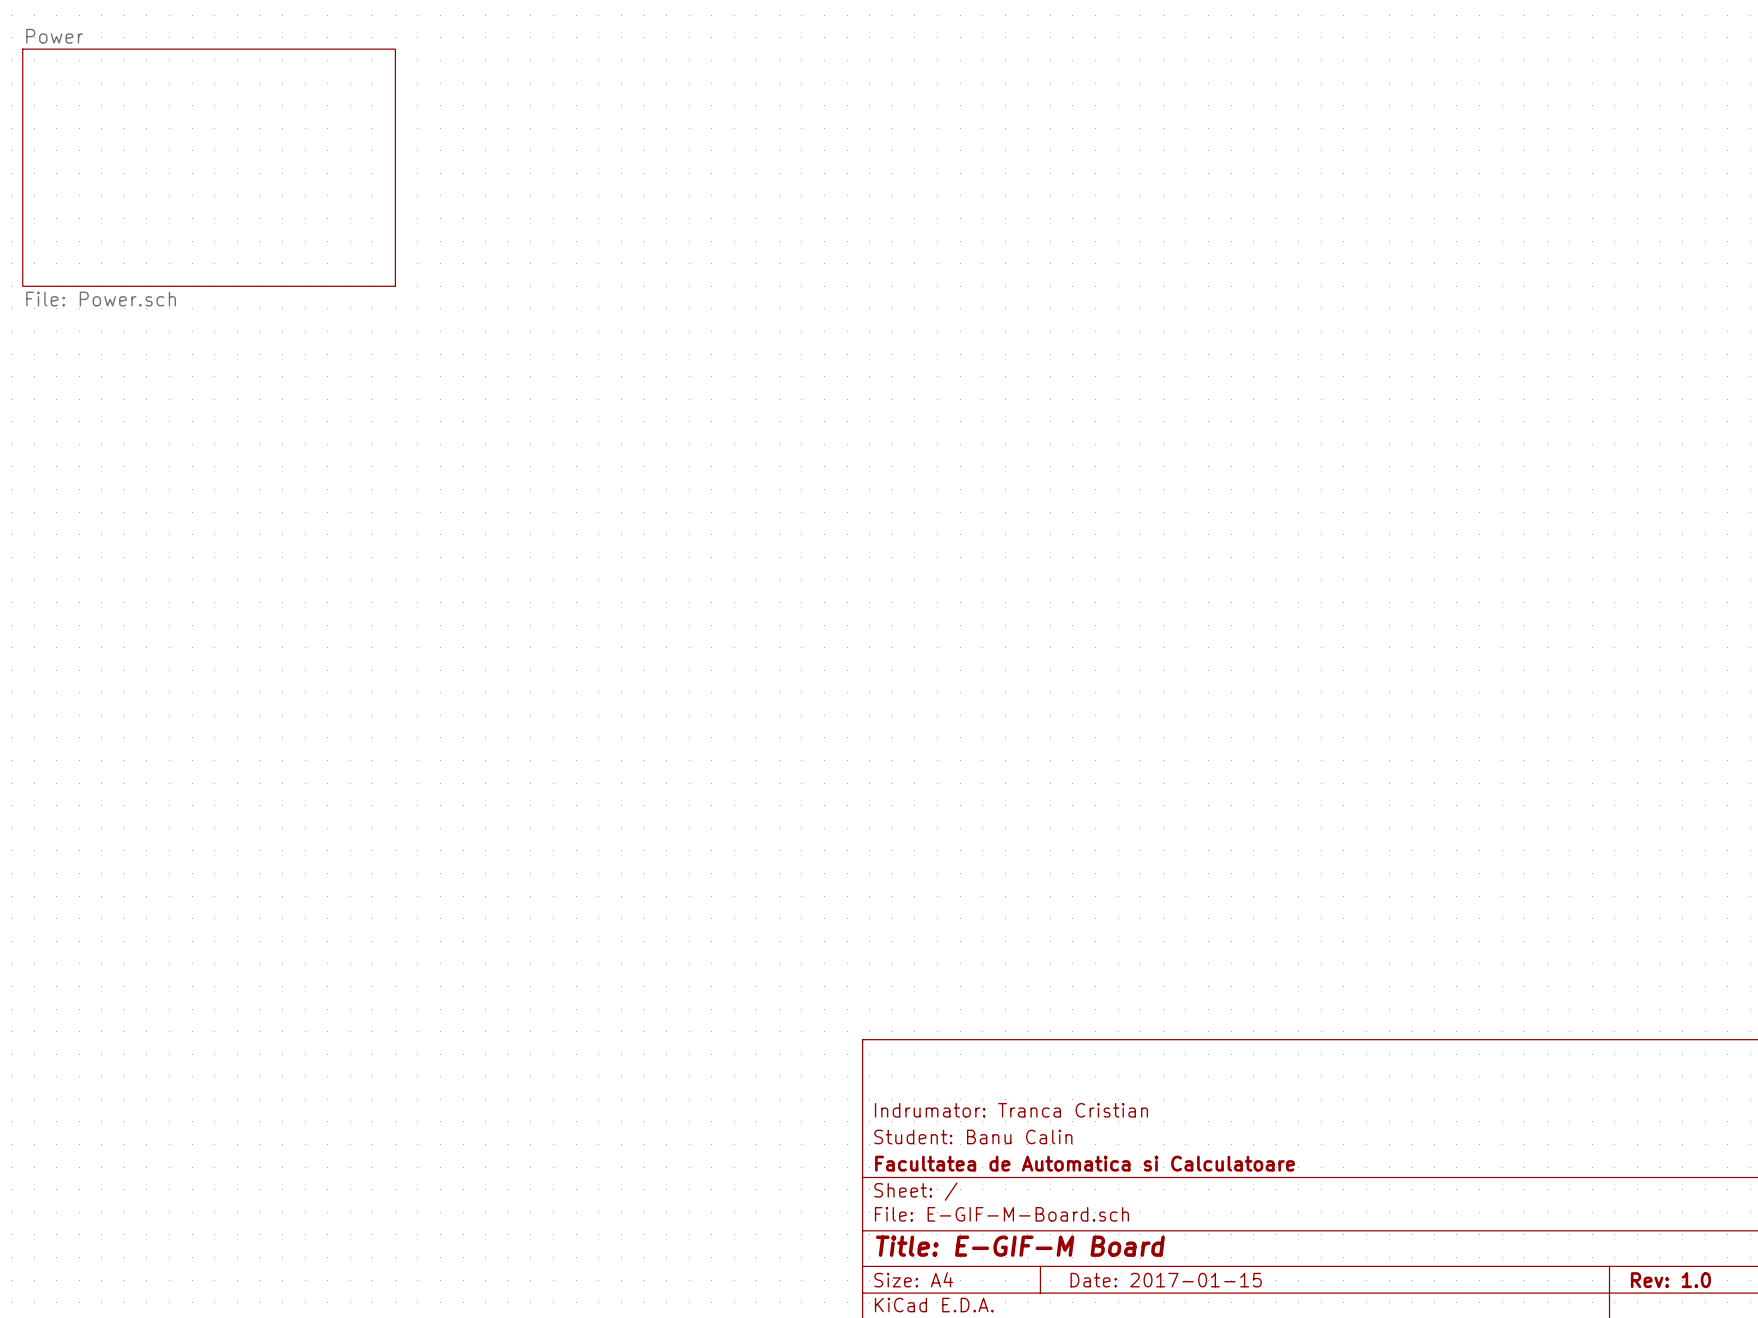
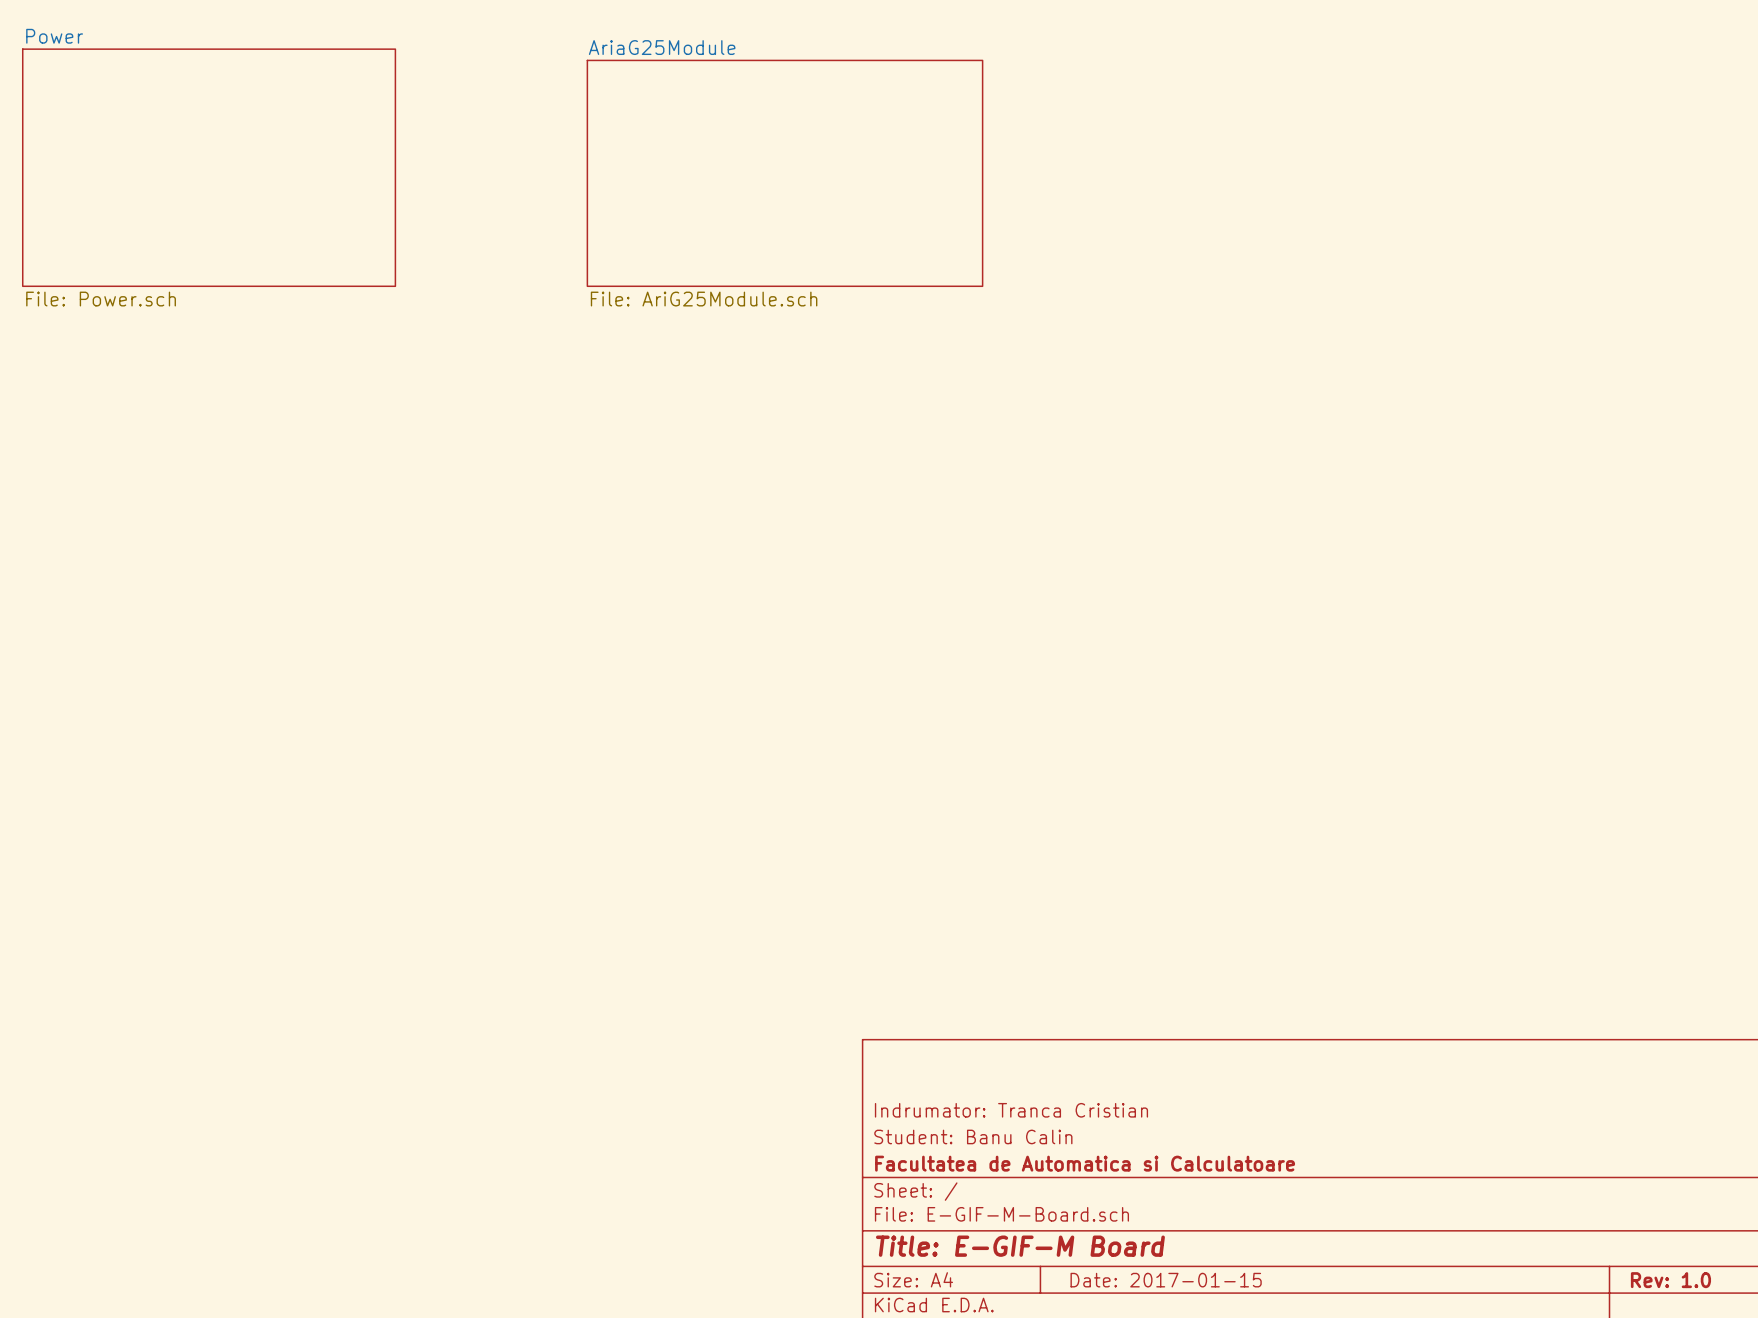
sheet AriaG25Module: none -> File: AriG25Module.sch (784, 173)

